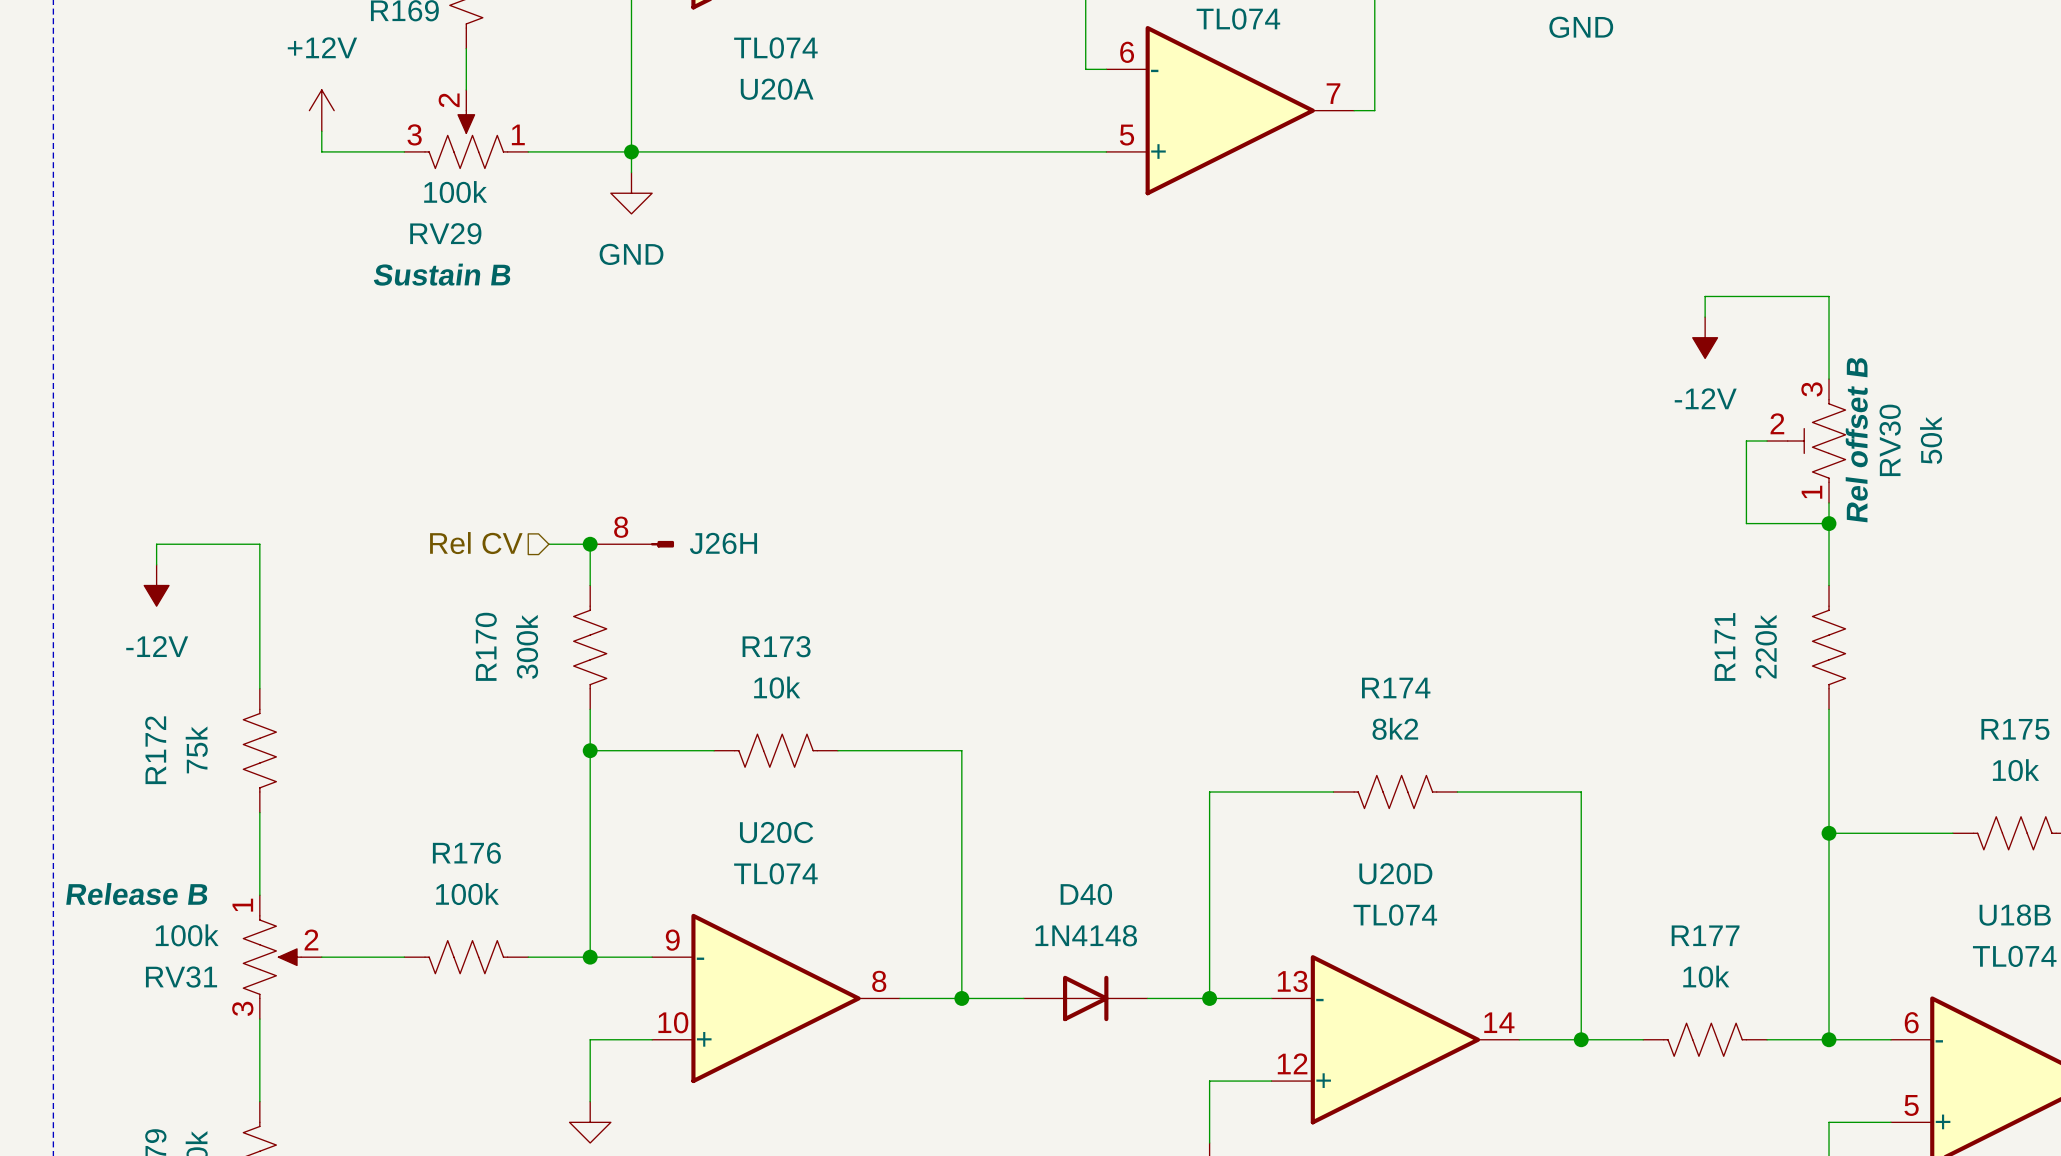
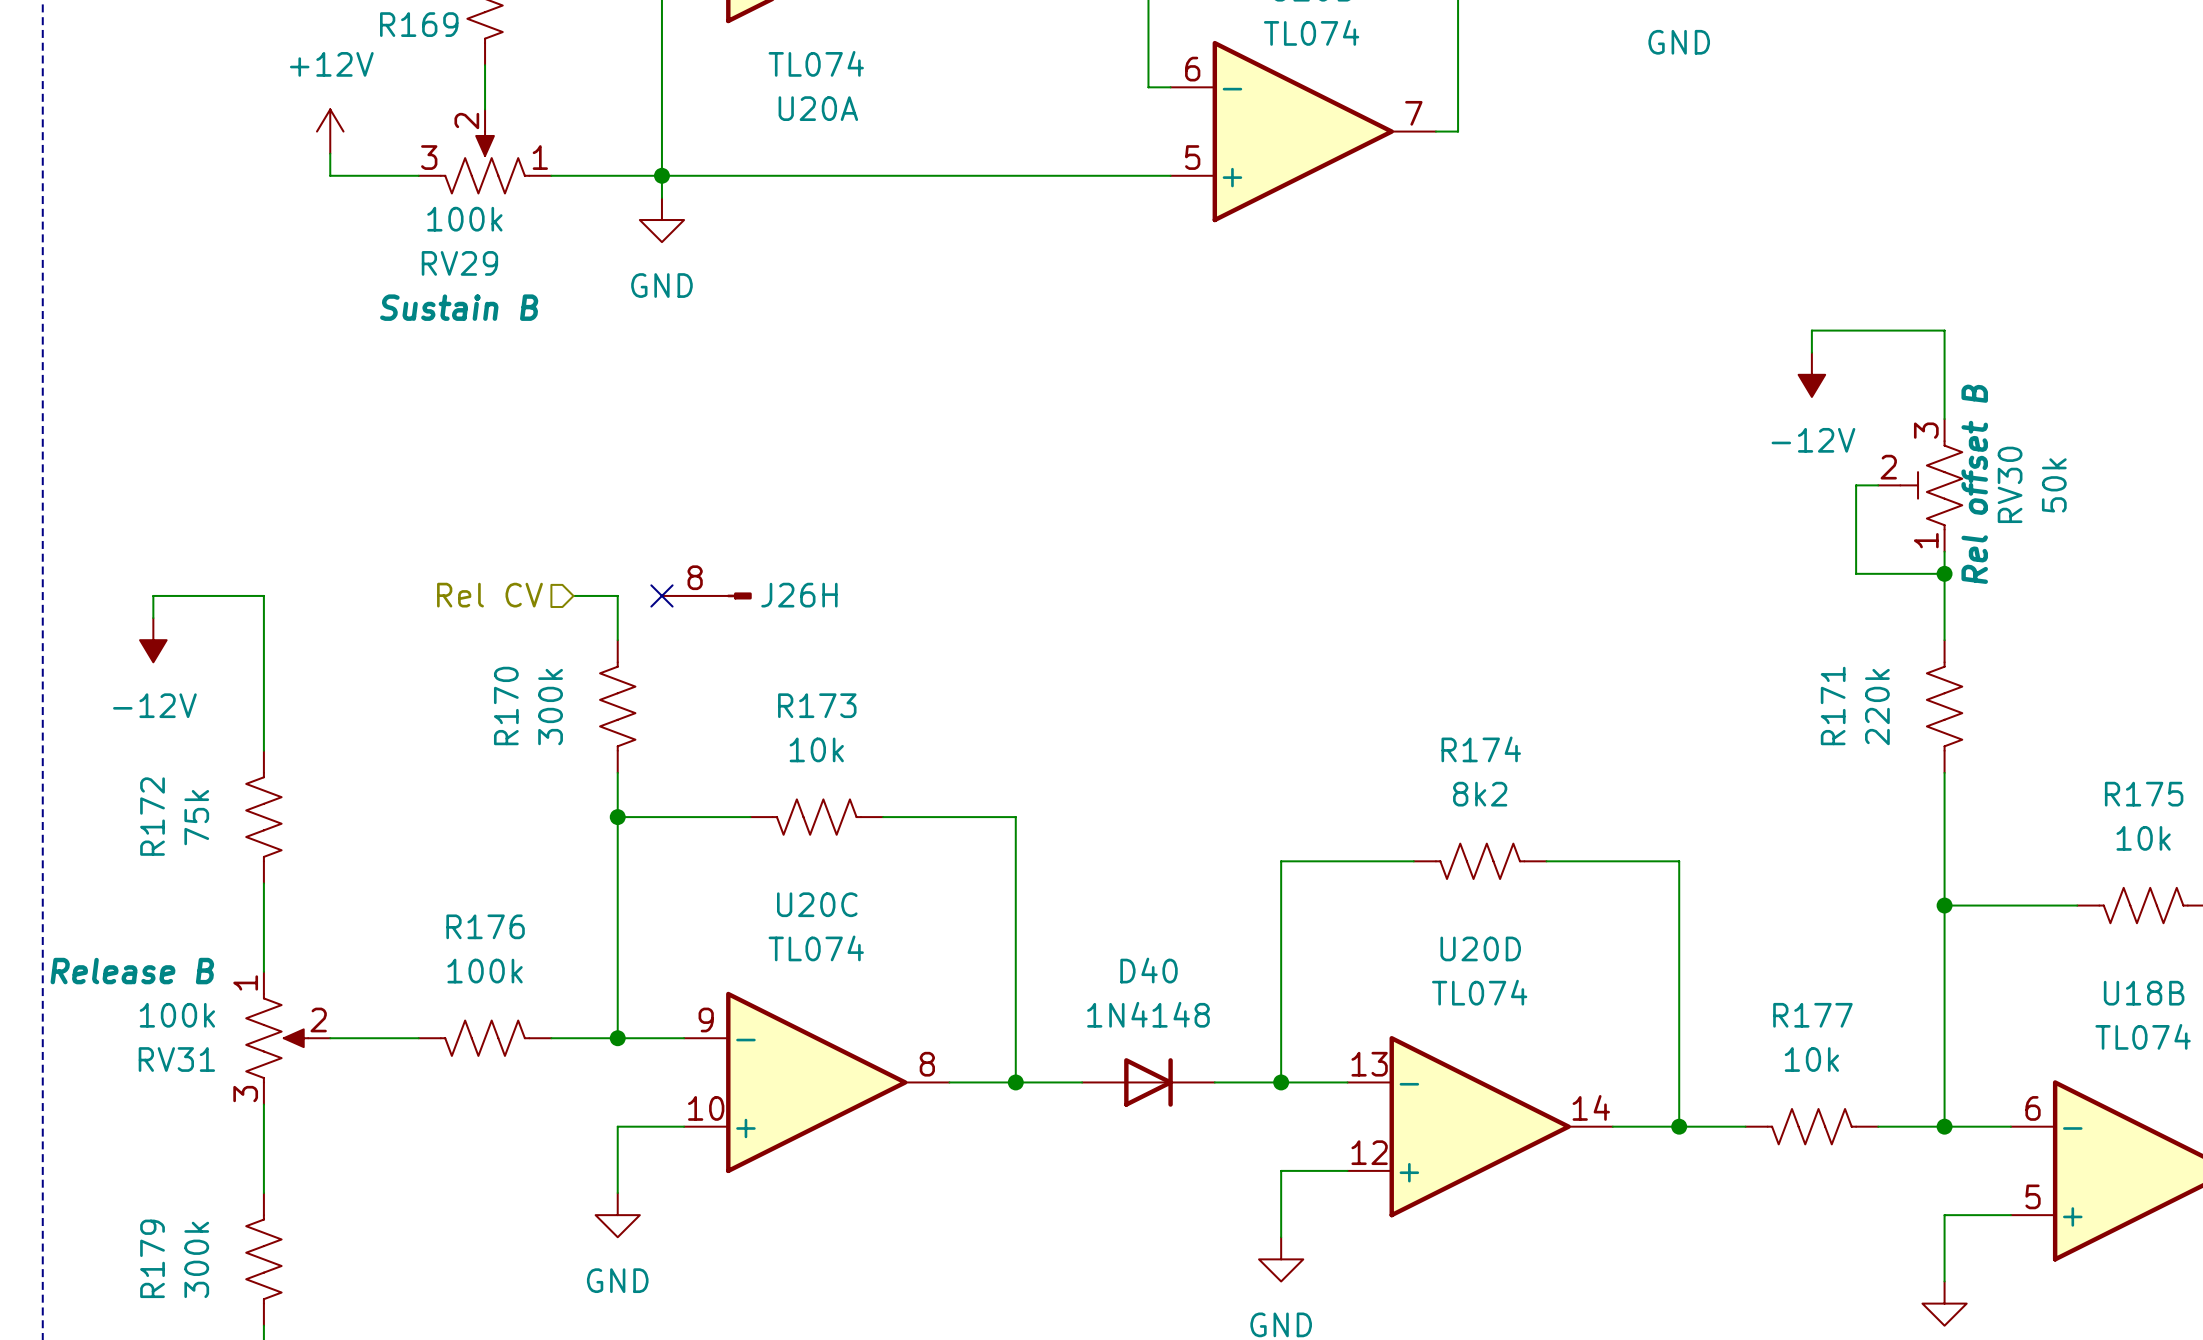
junction: (590, 544) -> none
no-connect mark: none -> (661, 595)
J26H position: (632, 544) -> (706, 595)

